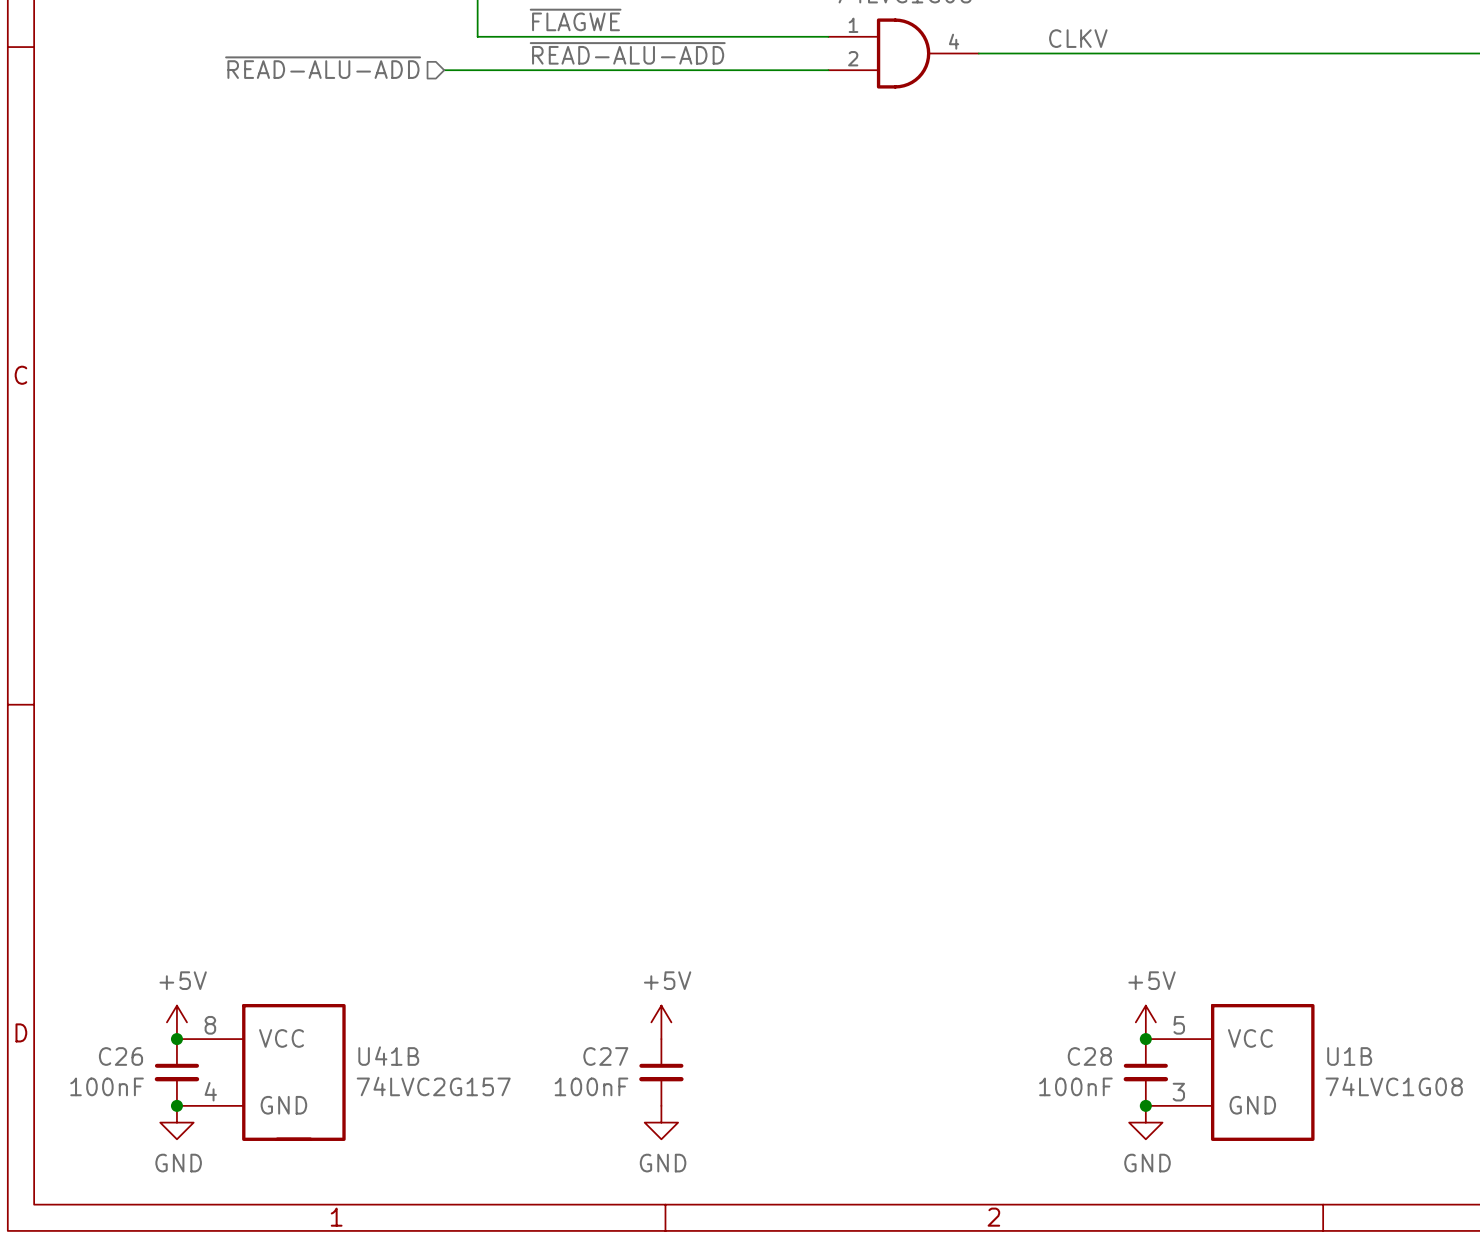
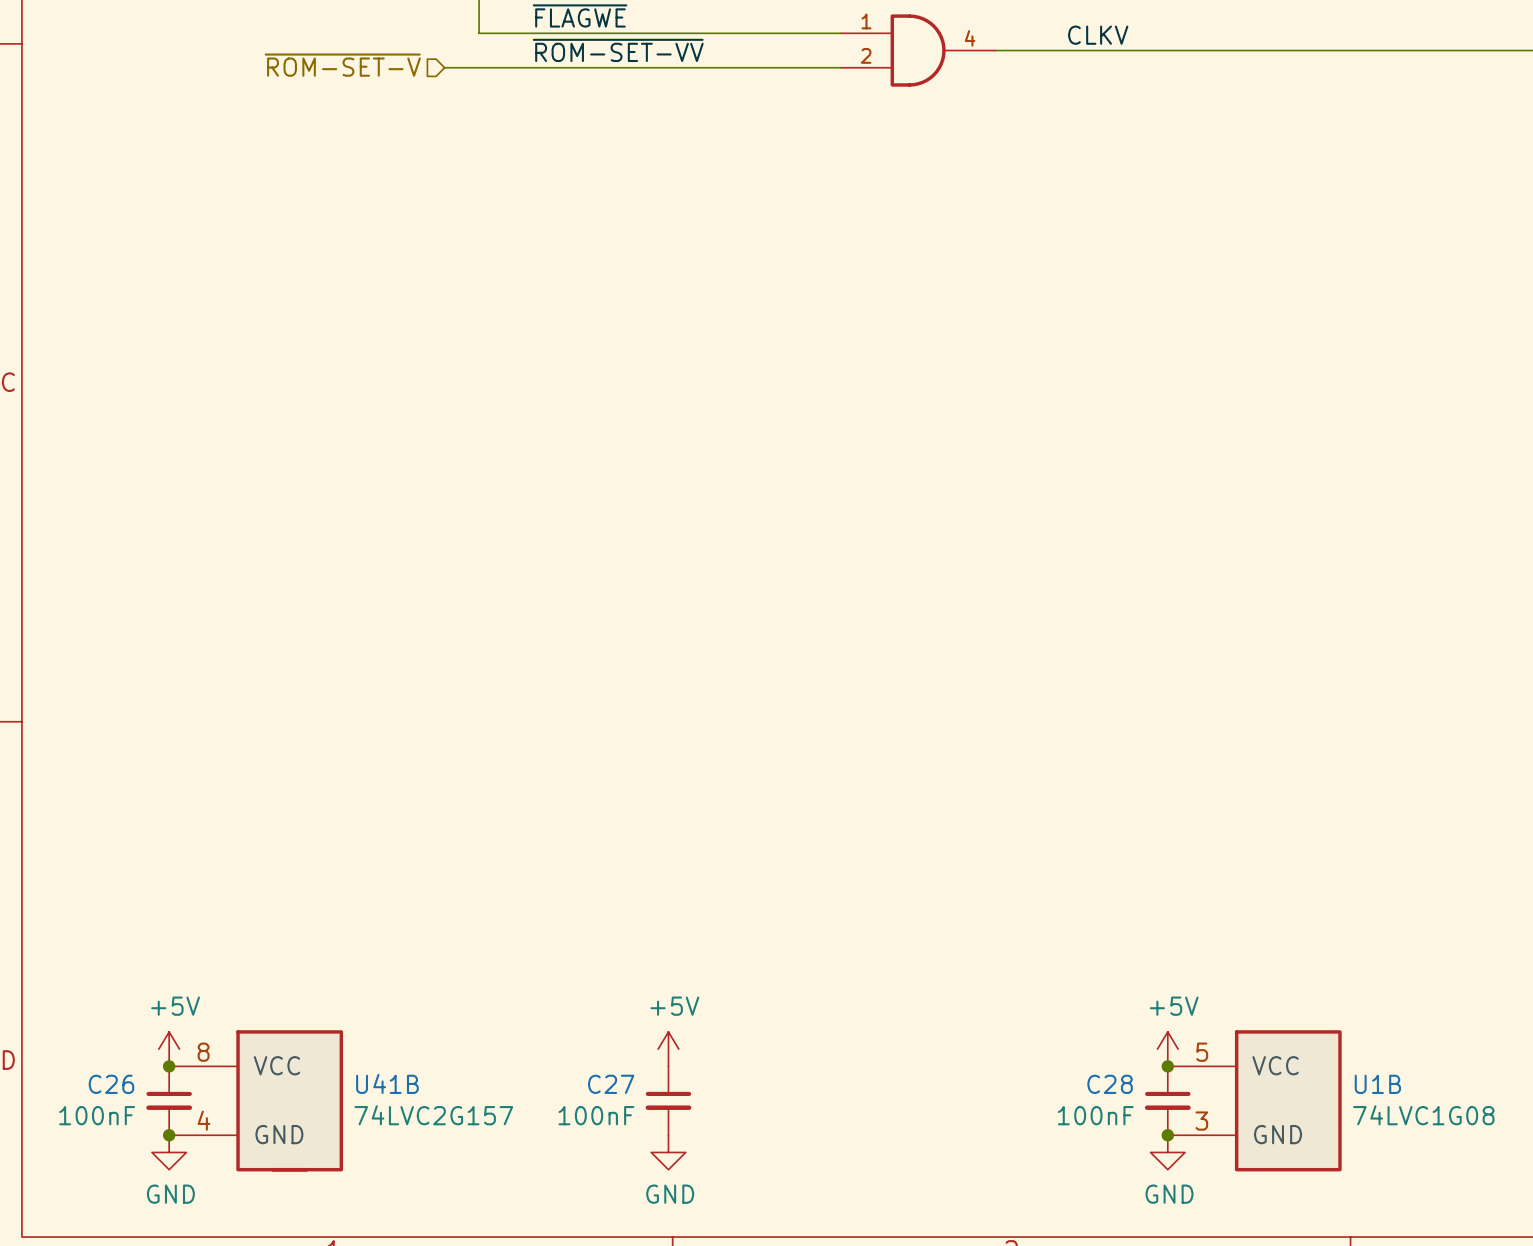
label: ~{READ-ALU-ADD} (627, 53) -> ~{ROM-SET-VV} (618, 50)
hierarchical label: ~{READ-ALU-ADD} (323, 67) -> ~{ROM-SET-V} (342, 65)

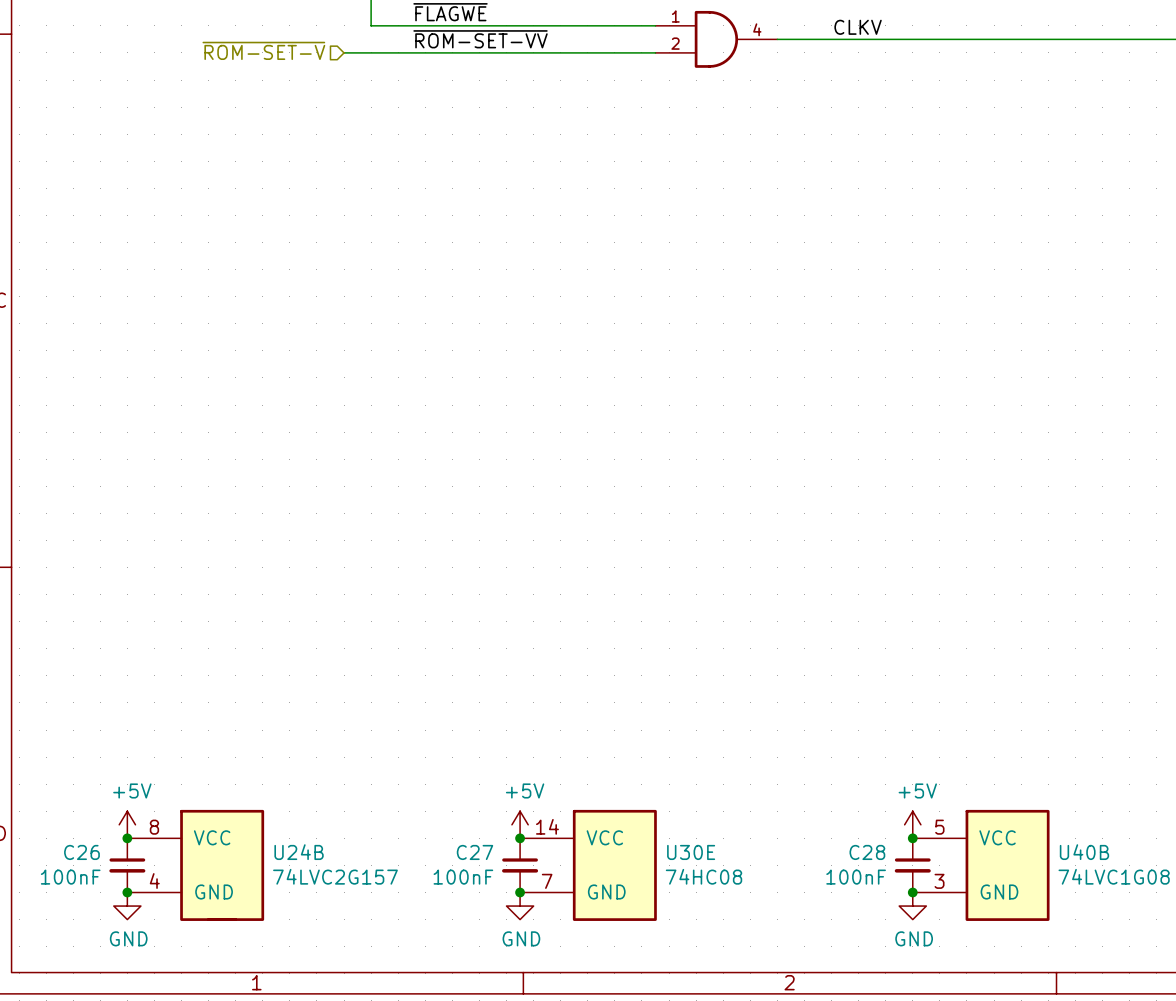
junction: none -> (520, 838)
U41B name: U41B (387, 1083) -> U24B (299, 852)
U1B name: U1B (1377, 1084) -> U40B (1084, 852)
U30E: none -> 74HC08 (588, 865)
junction: none -> (520, 892)

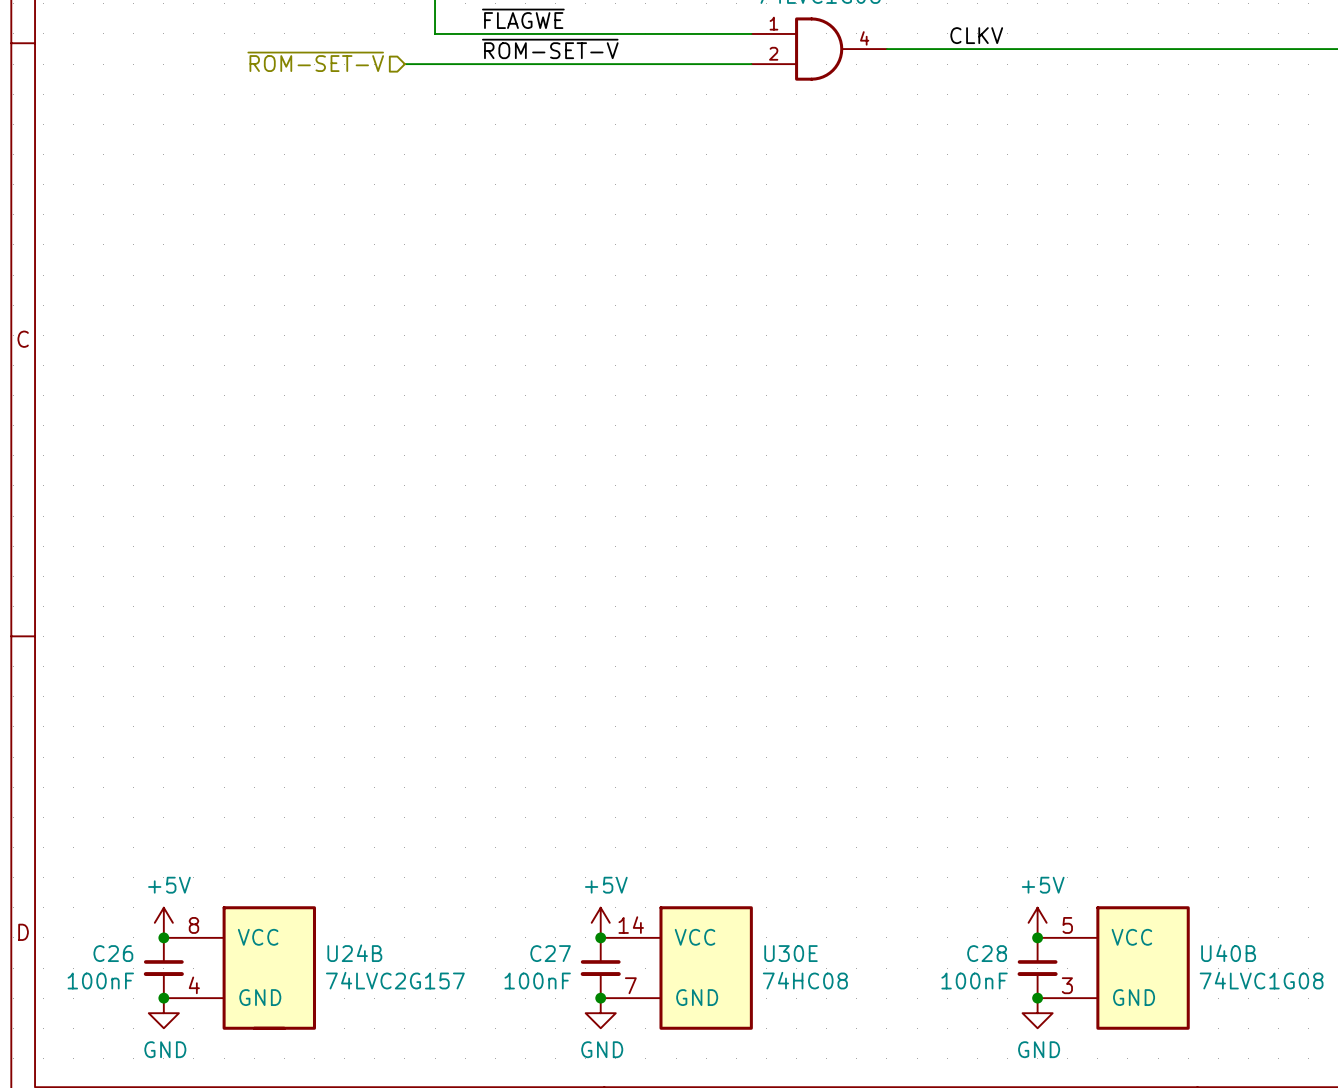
label: ~{ROM-SET-VV} (480, 39) -> ~{ROM-SET-V} (550, 48)

